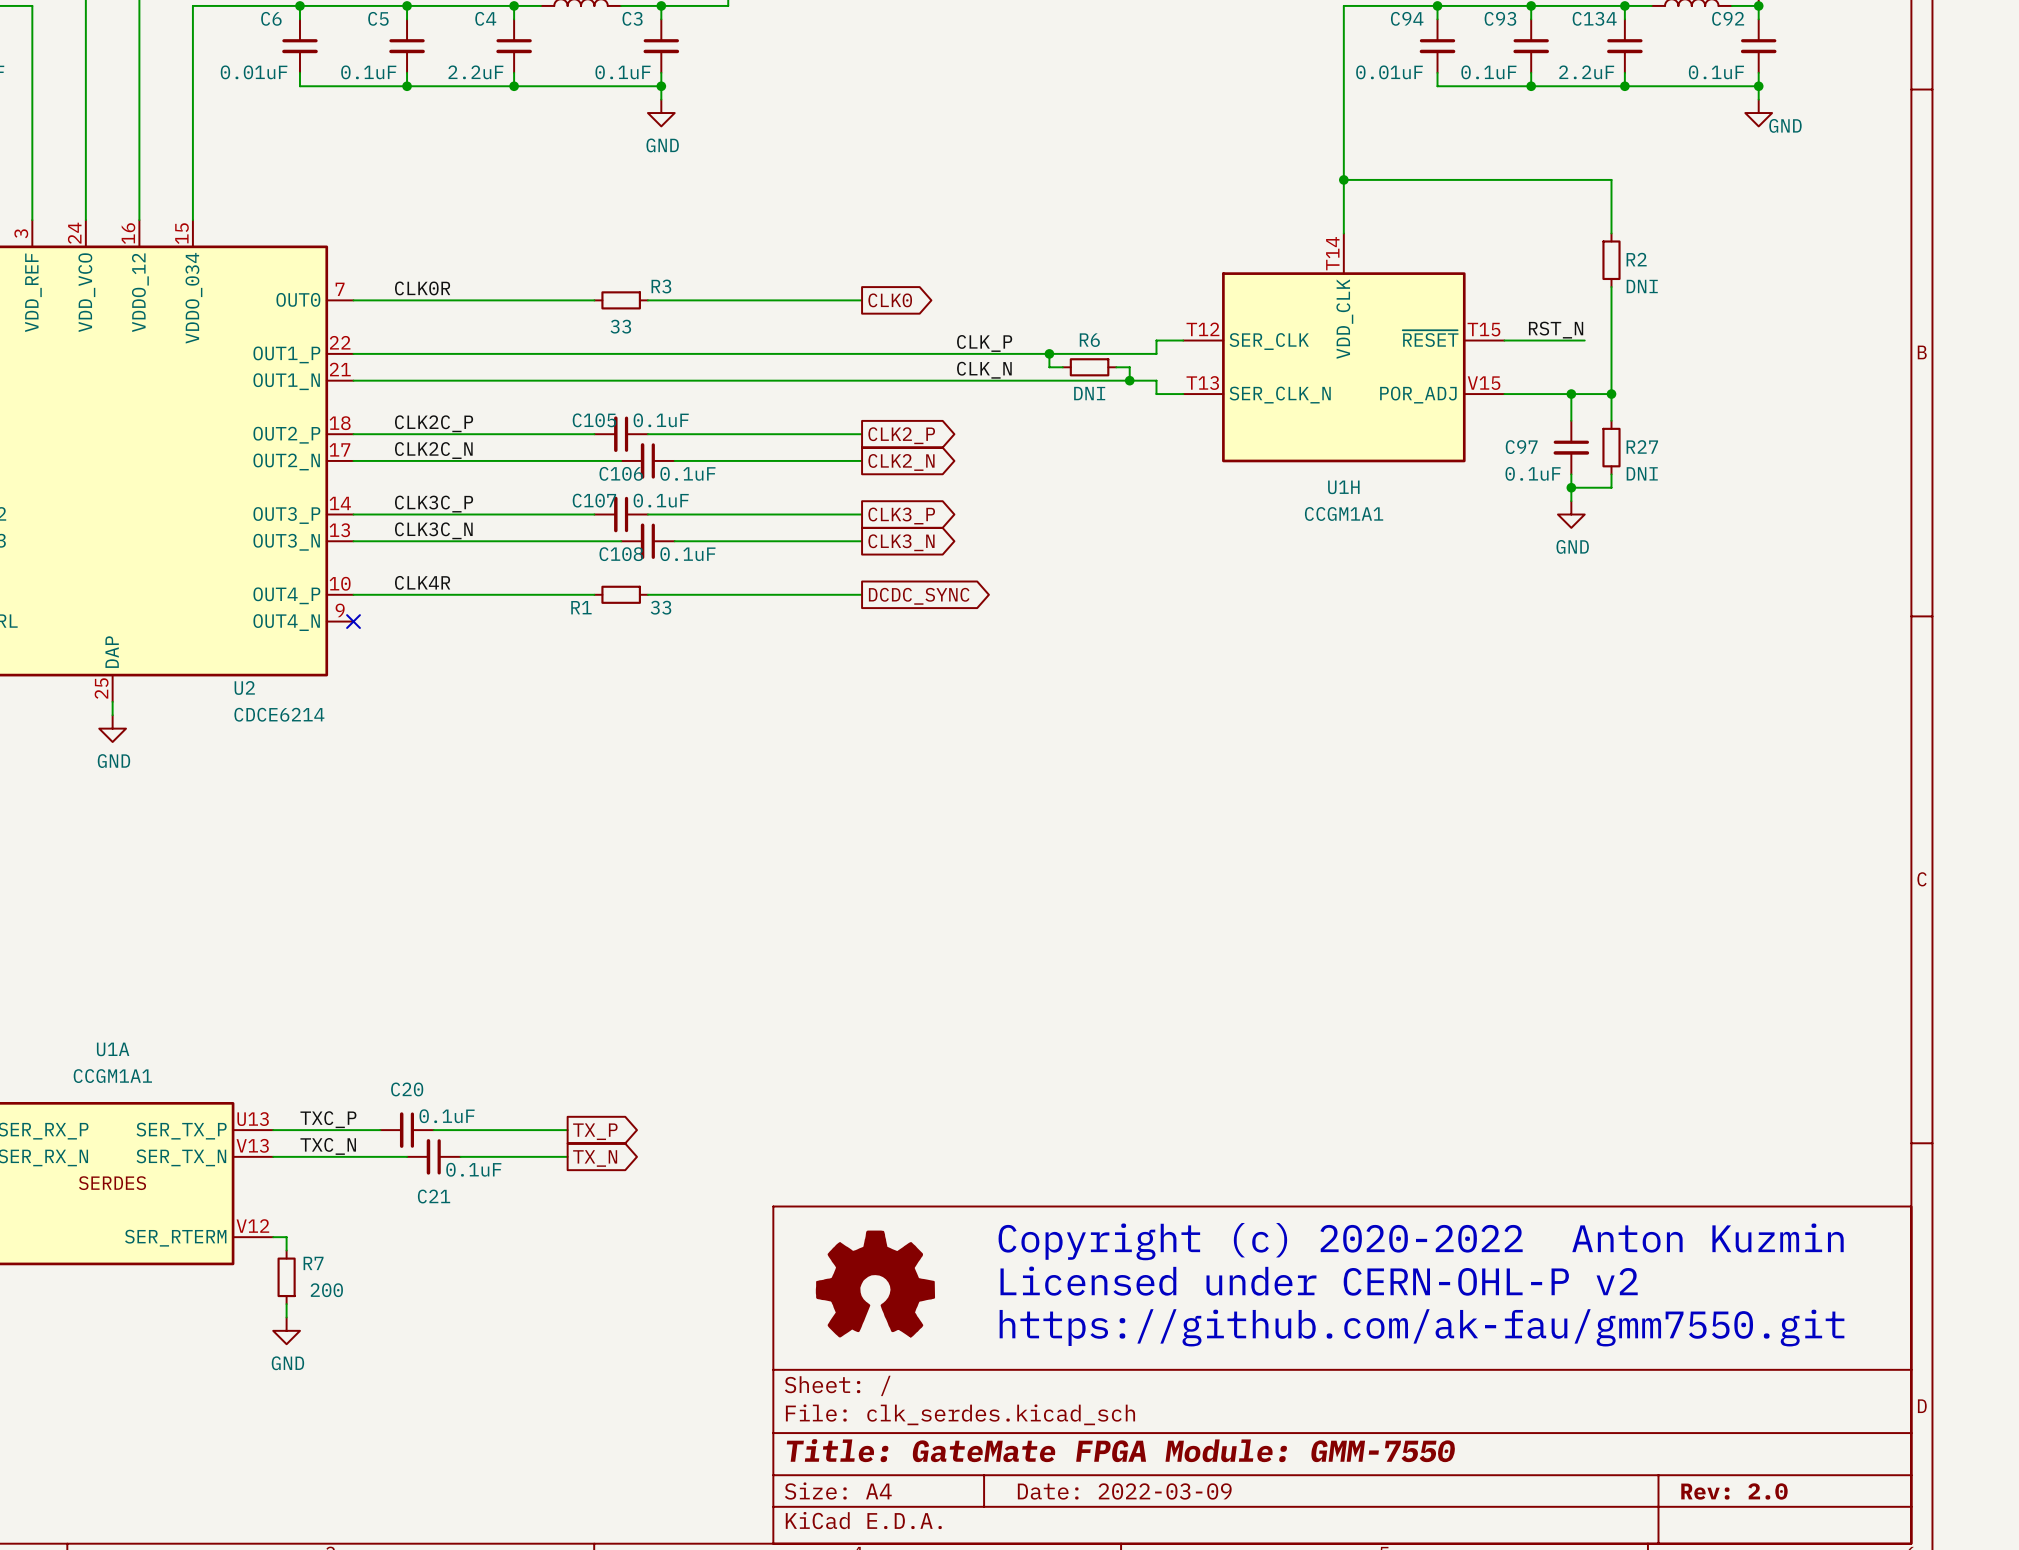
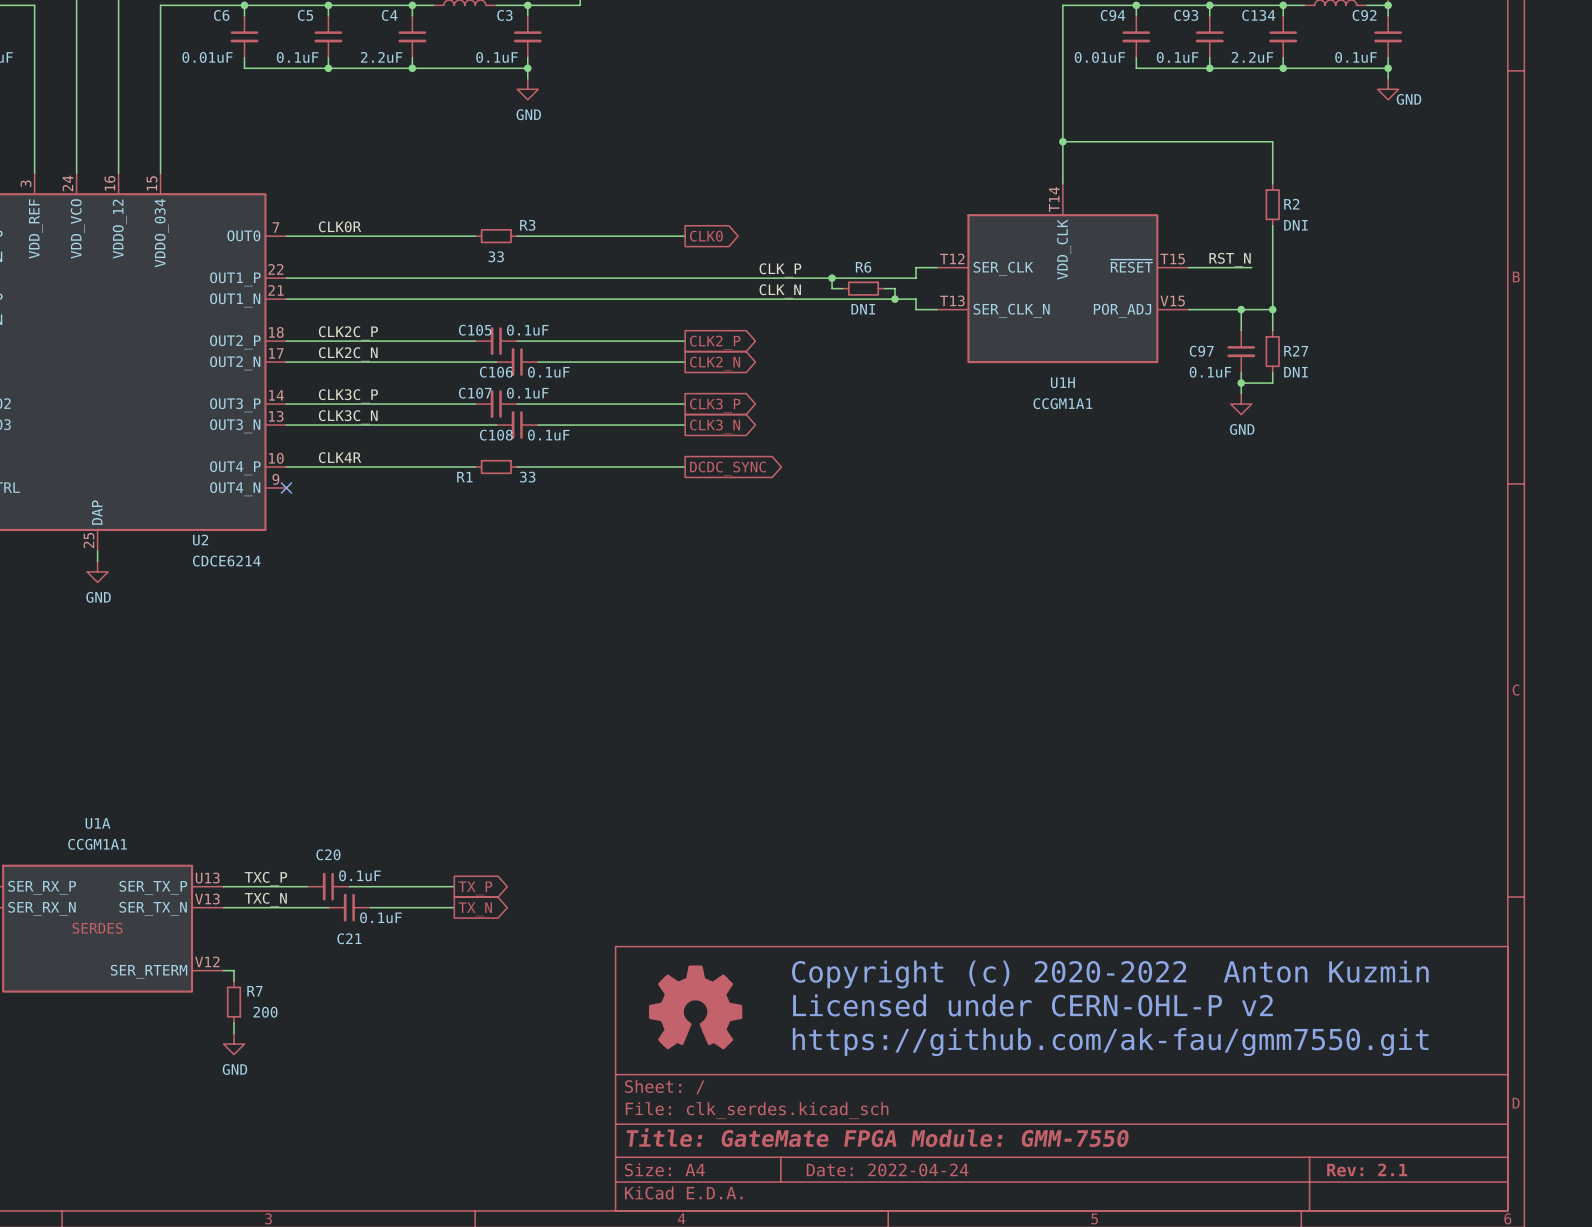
title block: Date: 2022-03-09 (1124, 1491) -> Date: 2022-04-24 (887, 1170)
title block: Rev: 2.0 (1734, 1491) -> Rev: 2.1 (1367, 1170)

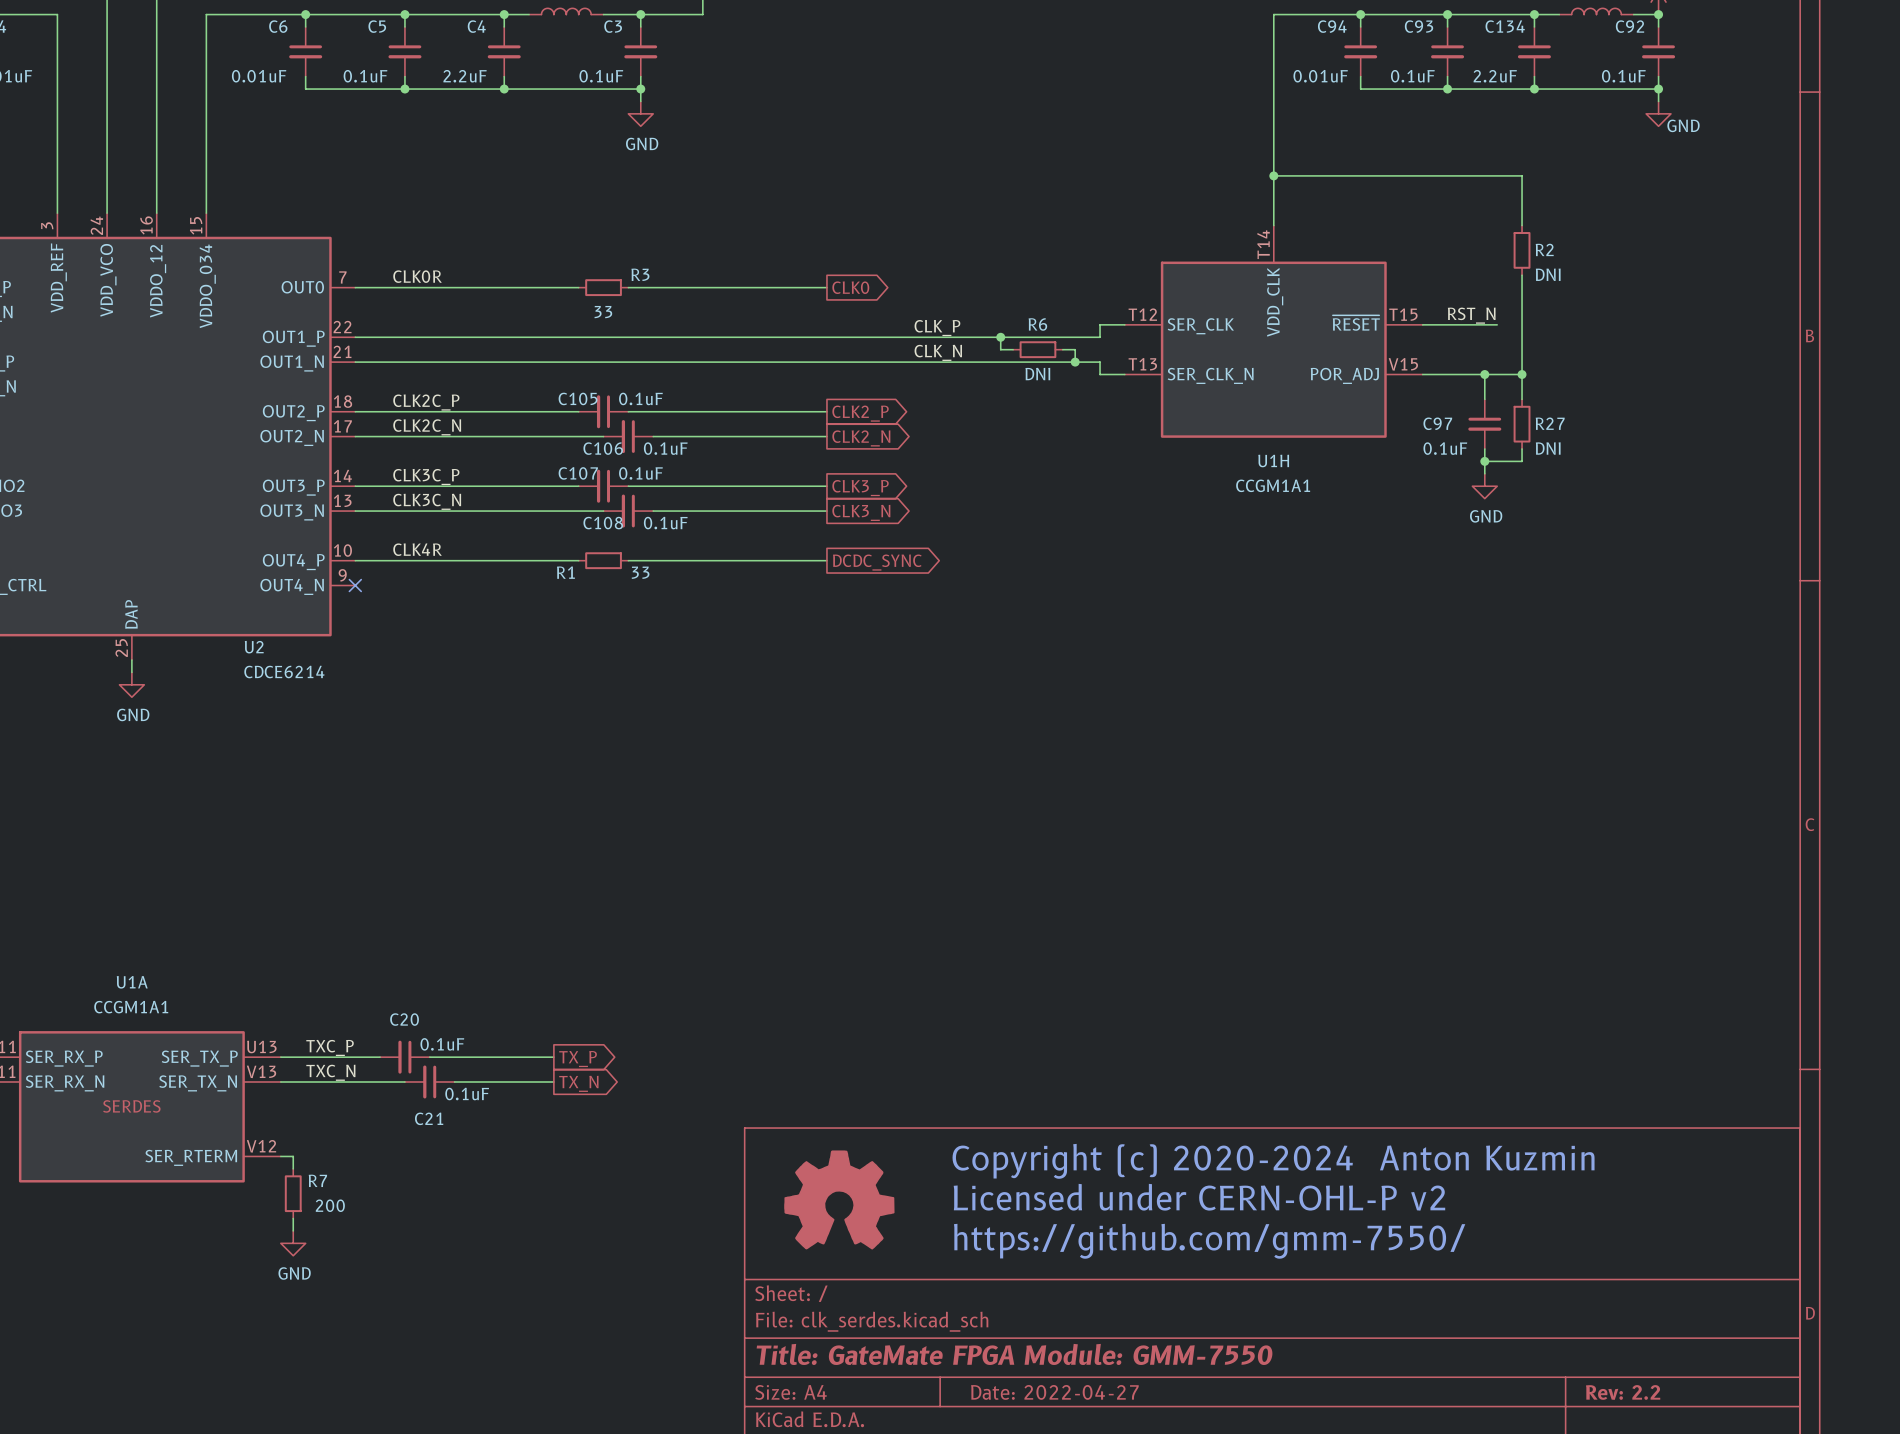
text: Copyright (c) 2020-2022 Anton Kuzmin (1110, 974) -> Copyright (c) 2020-2024 Anton Kuzmin (1273, 1161)
text: https://github.com/ak-fau/gmm7550.git (1110, 1042) -> https://github.com/gmm-7550/ (1209, 1241)
title block: Date: 2022-04-24 (887, 1170) -> Date: 2022-04-27 (1054, 1392)
title block: Rev: 2.1 (1367, 1170) -> Rev: 2.2 (1623, 1392)

